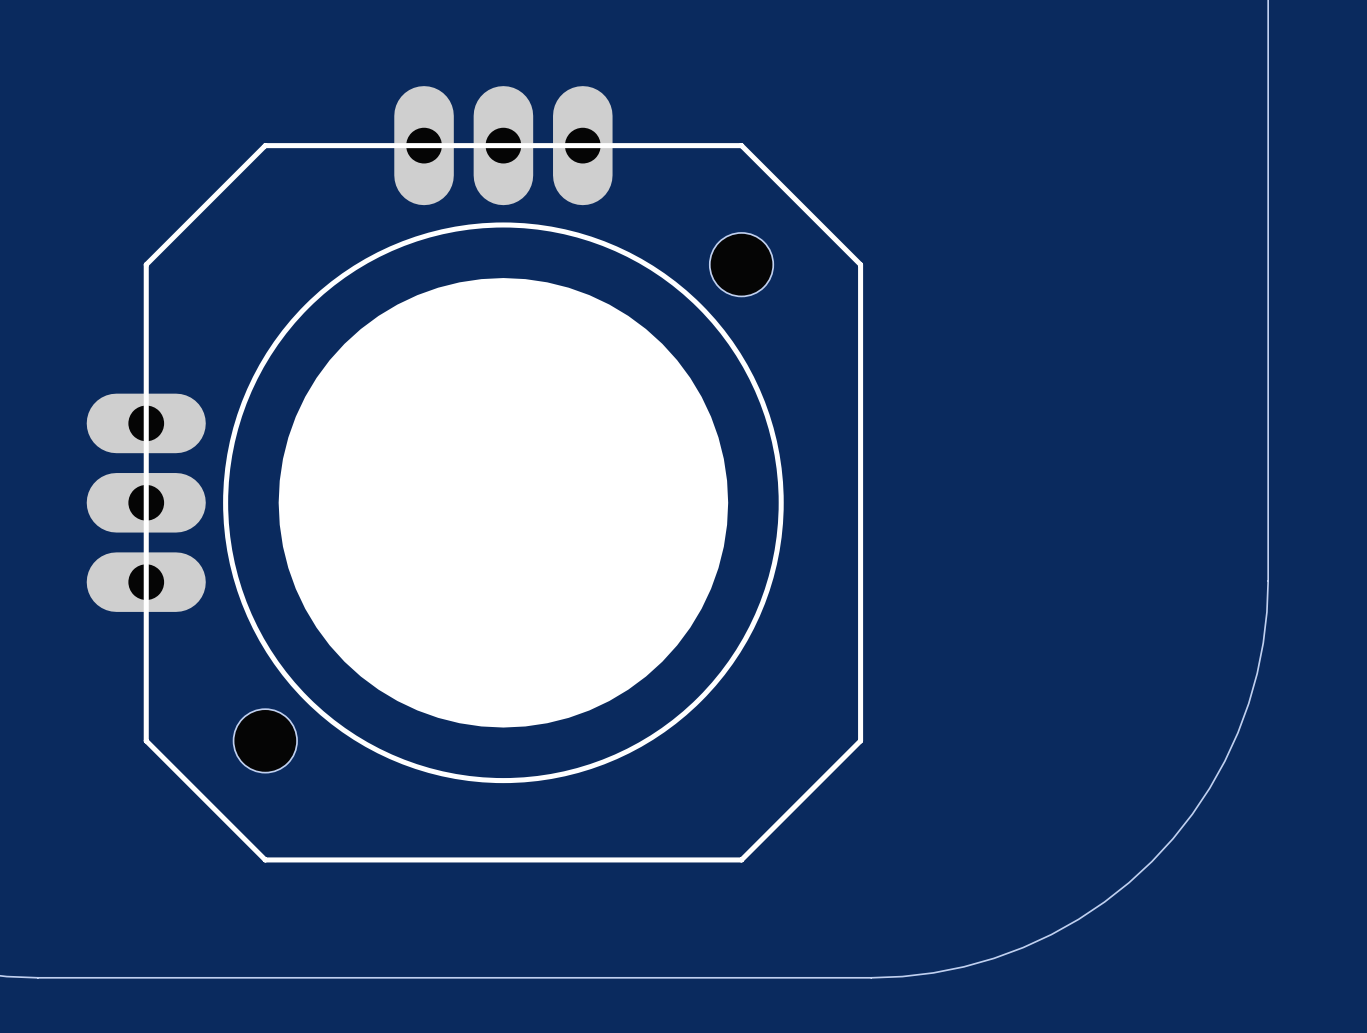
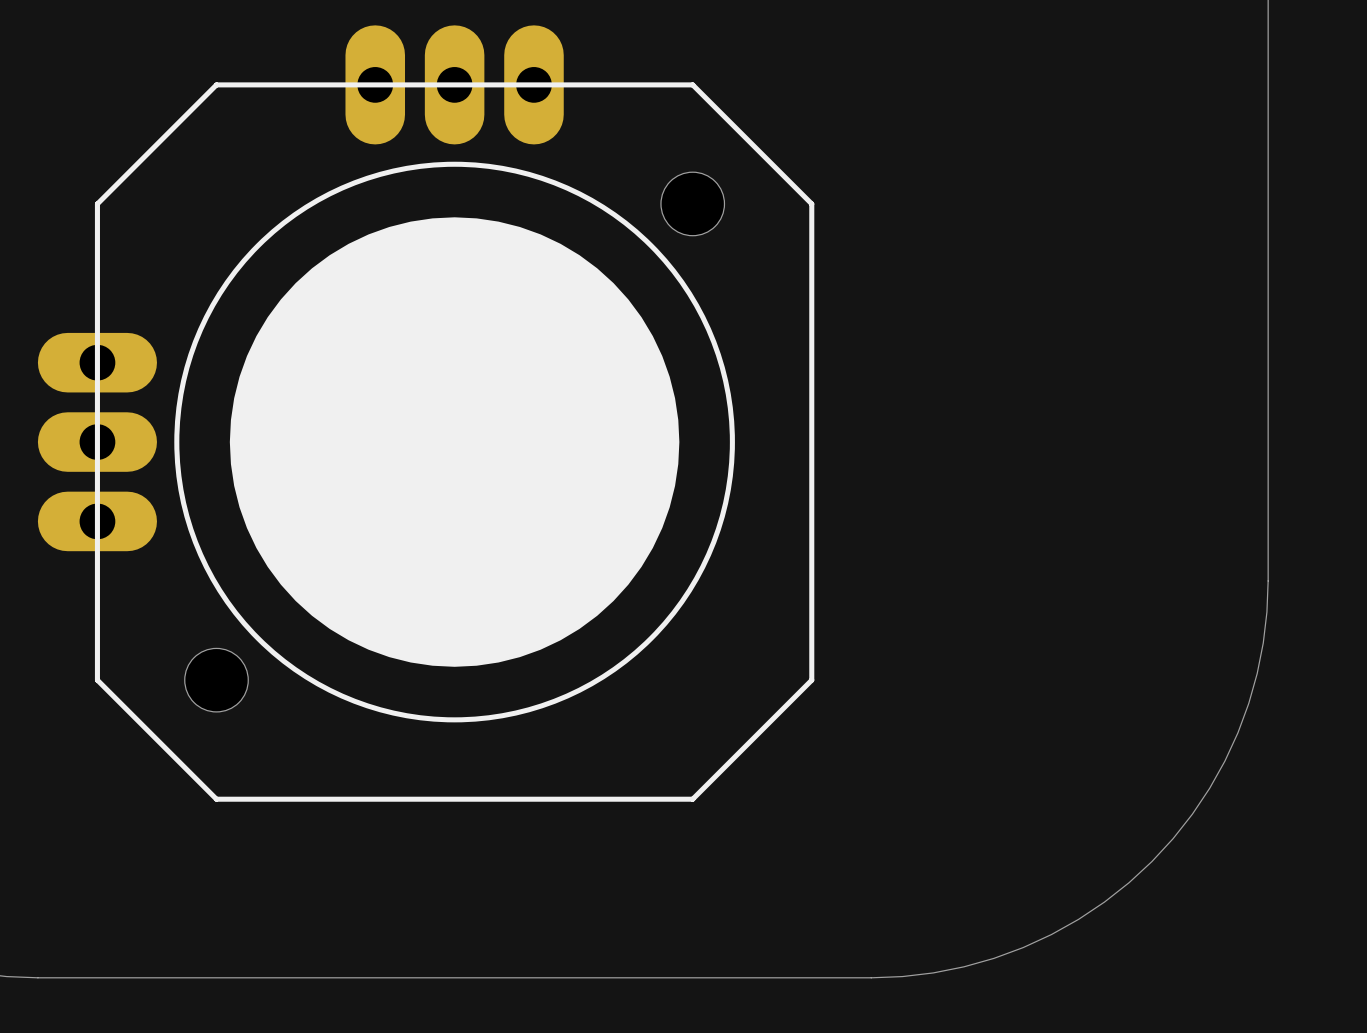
part position: (474, 474) -> (426, 413)

